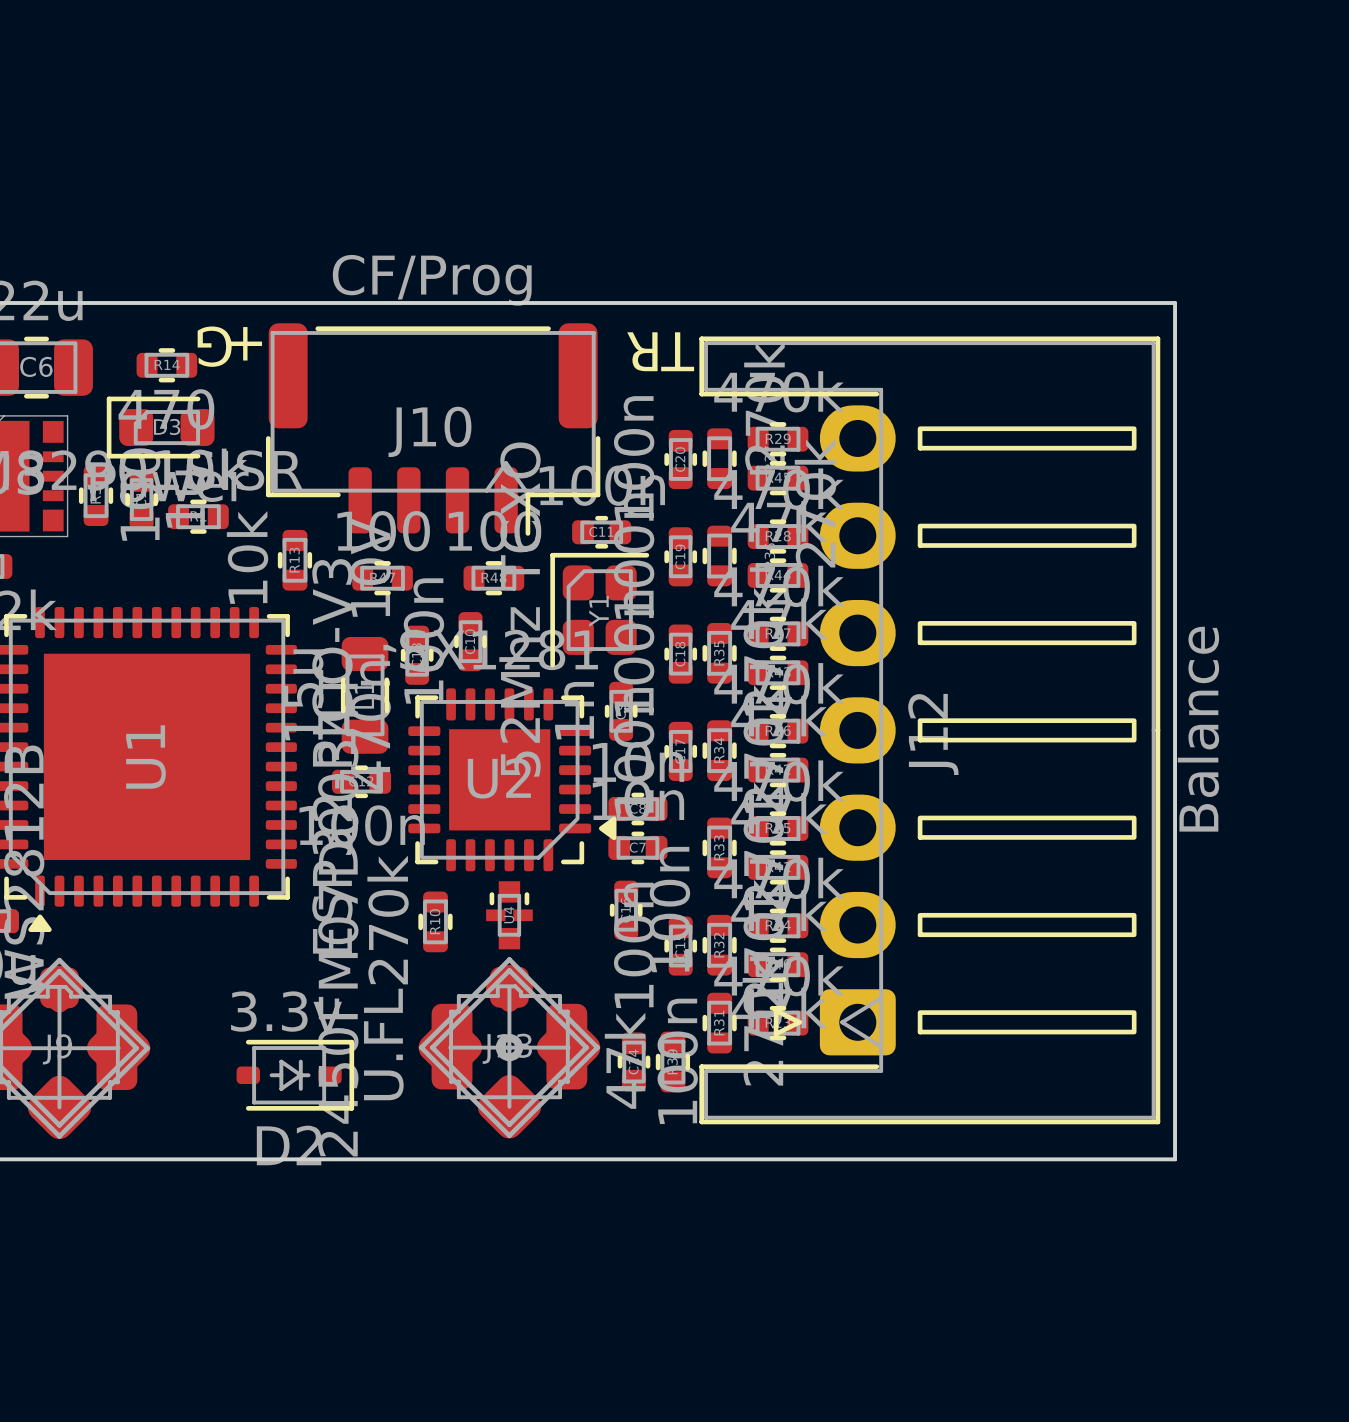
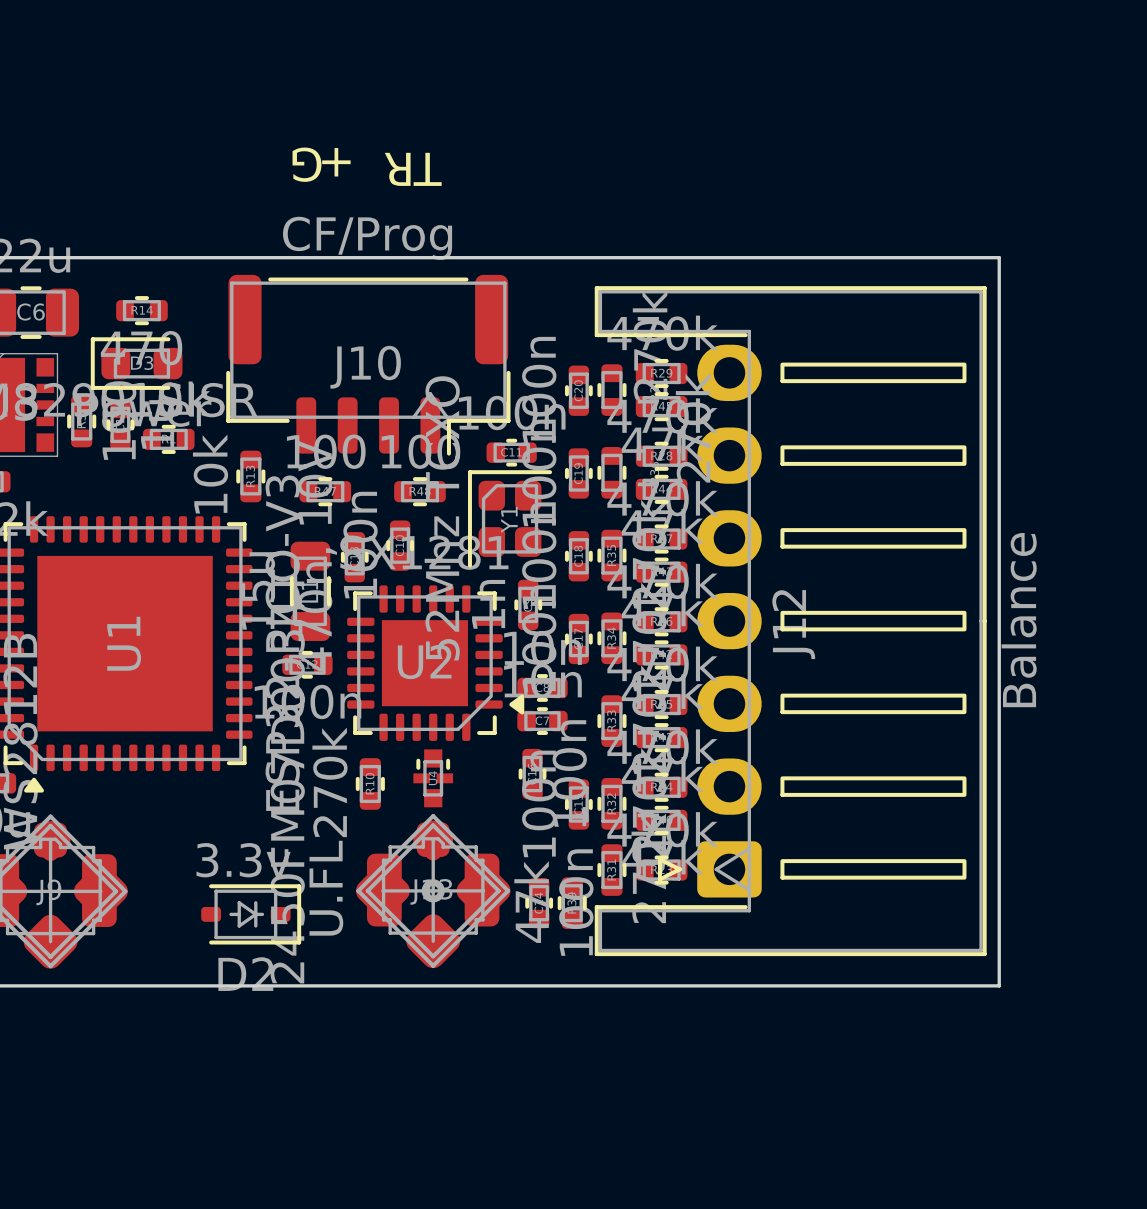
text position: + (245, 343) -> + (336, 162)
text position: G (214, 346) -> G (306, 164)
text position: R (642, 351) -> R (397, 169)
text position: T (677, 351) -> T (427, 169)

